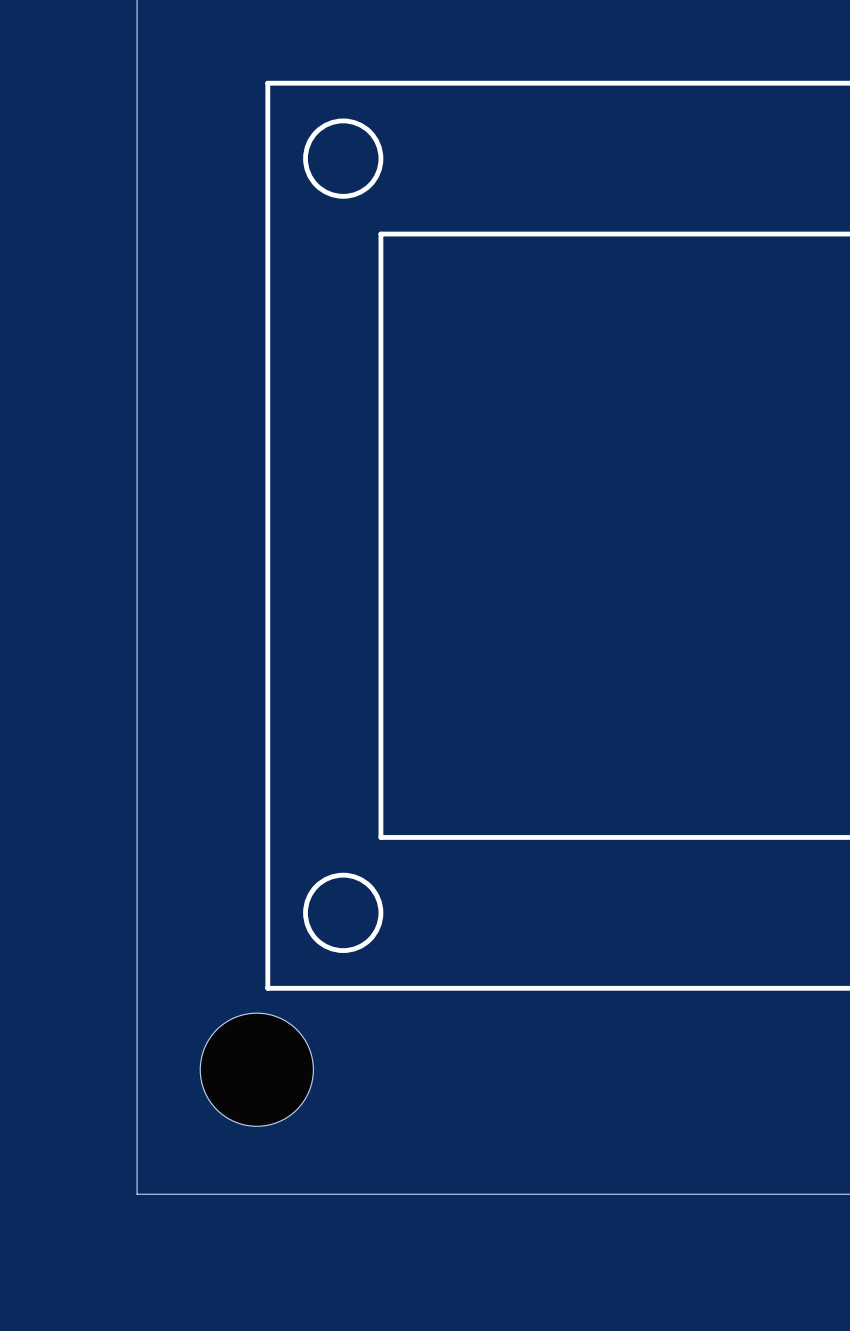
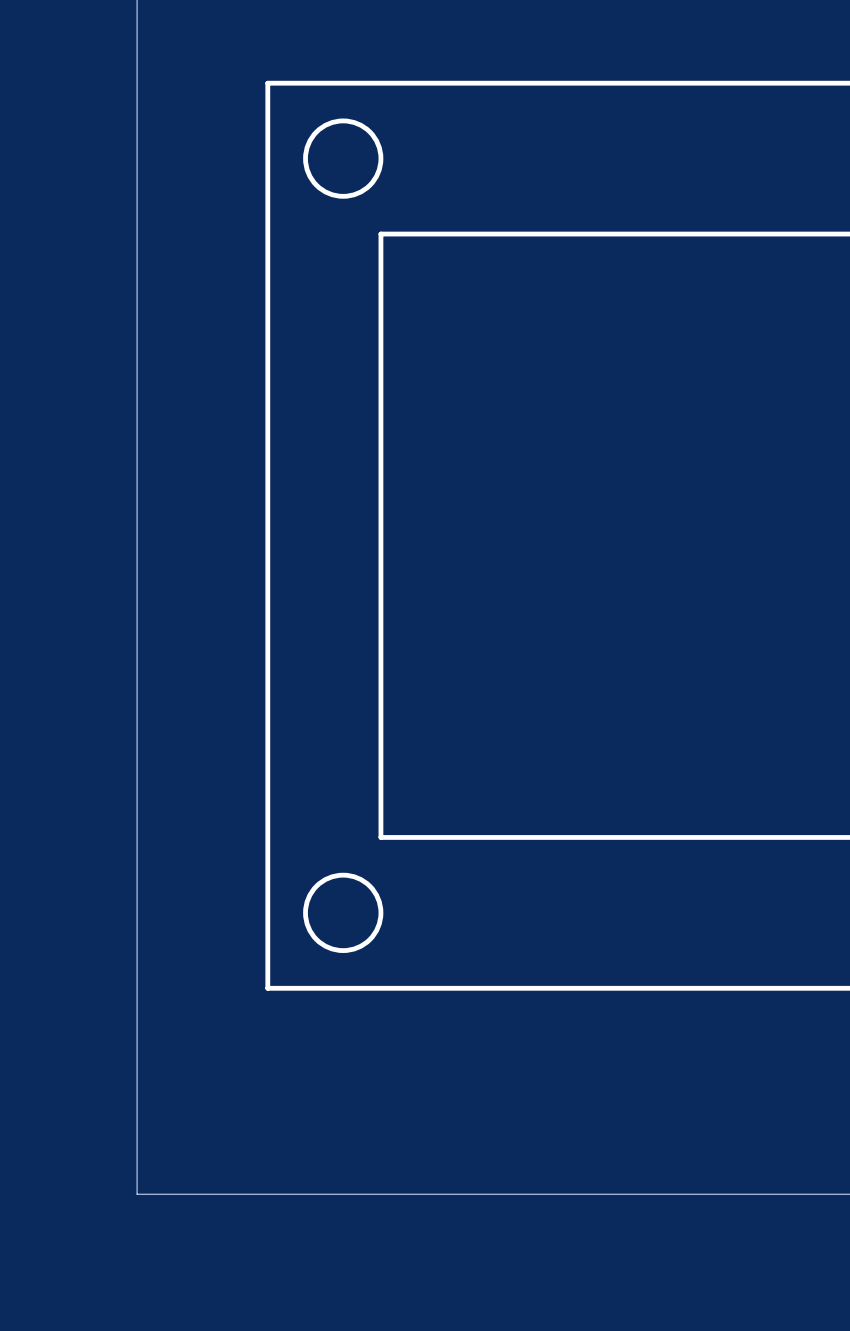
hole: (256, 1069) -> none

